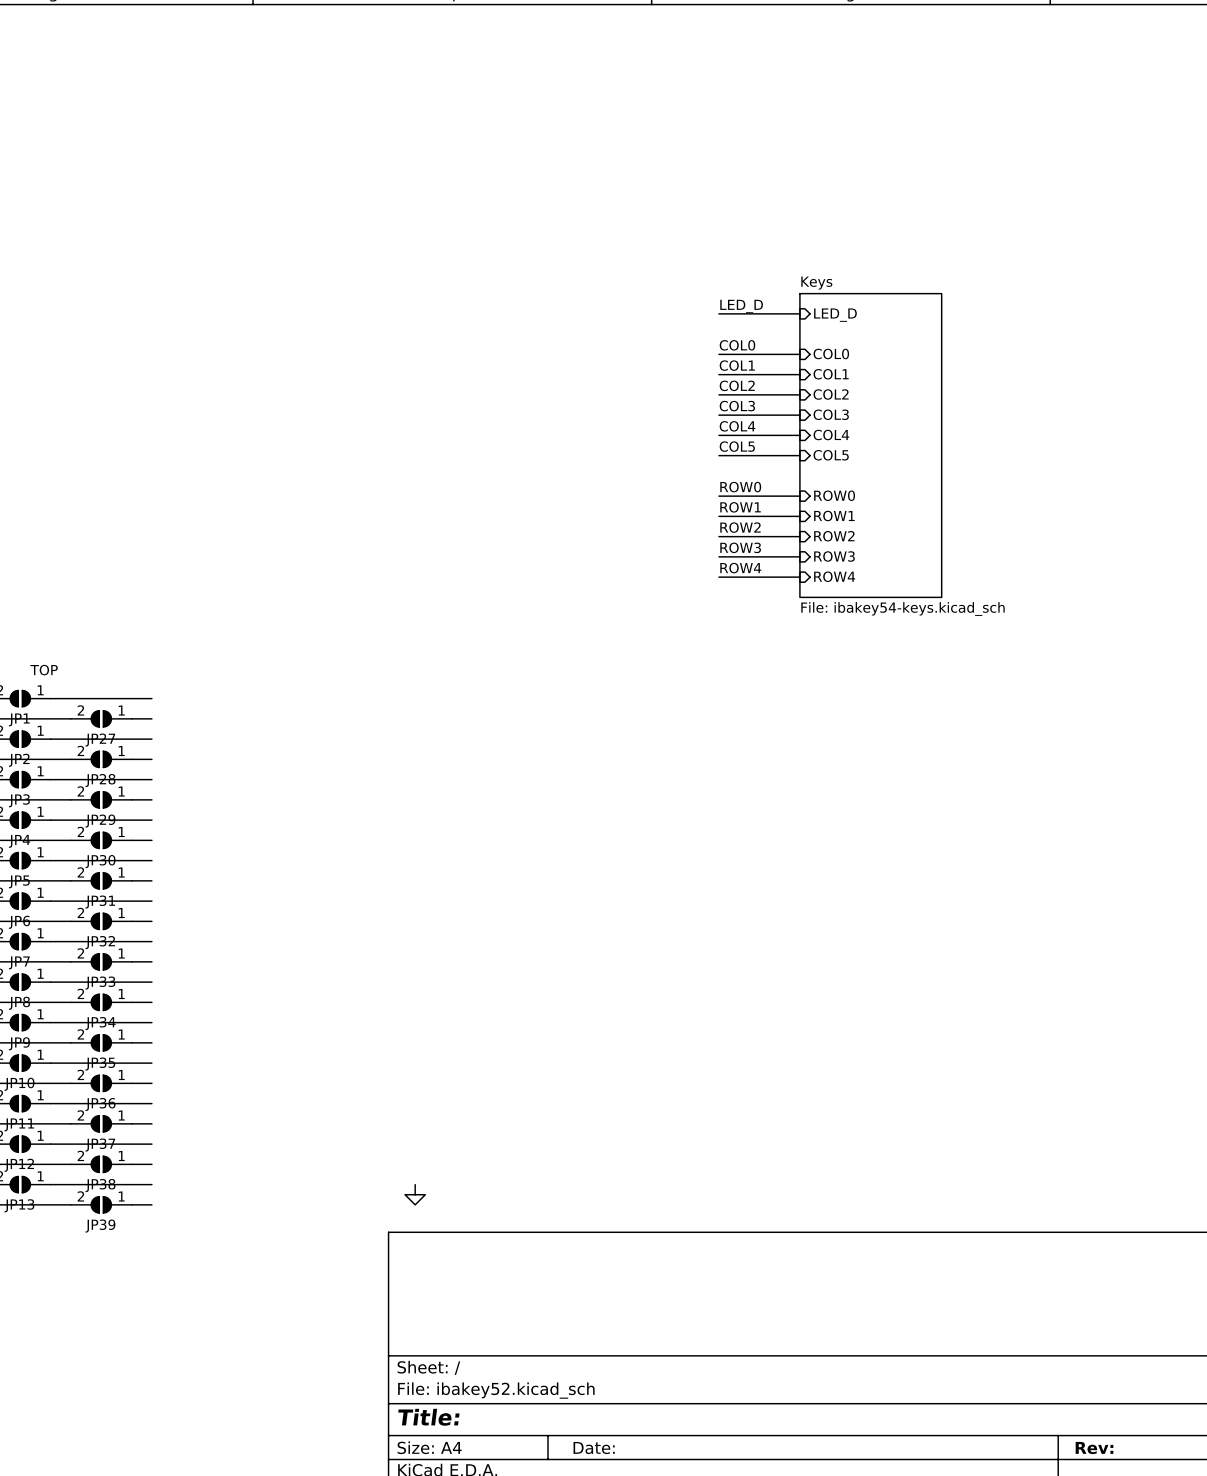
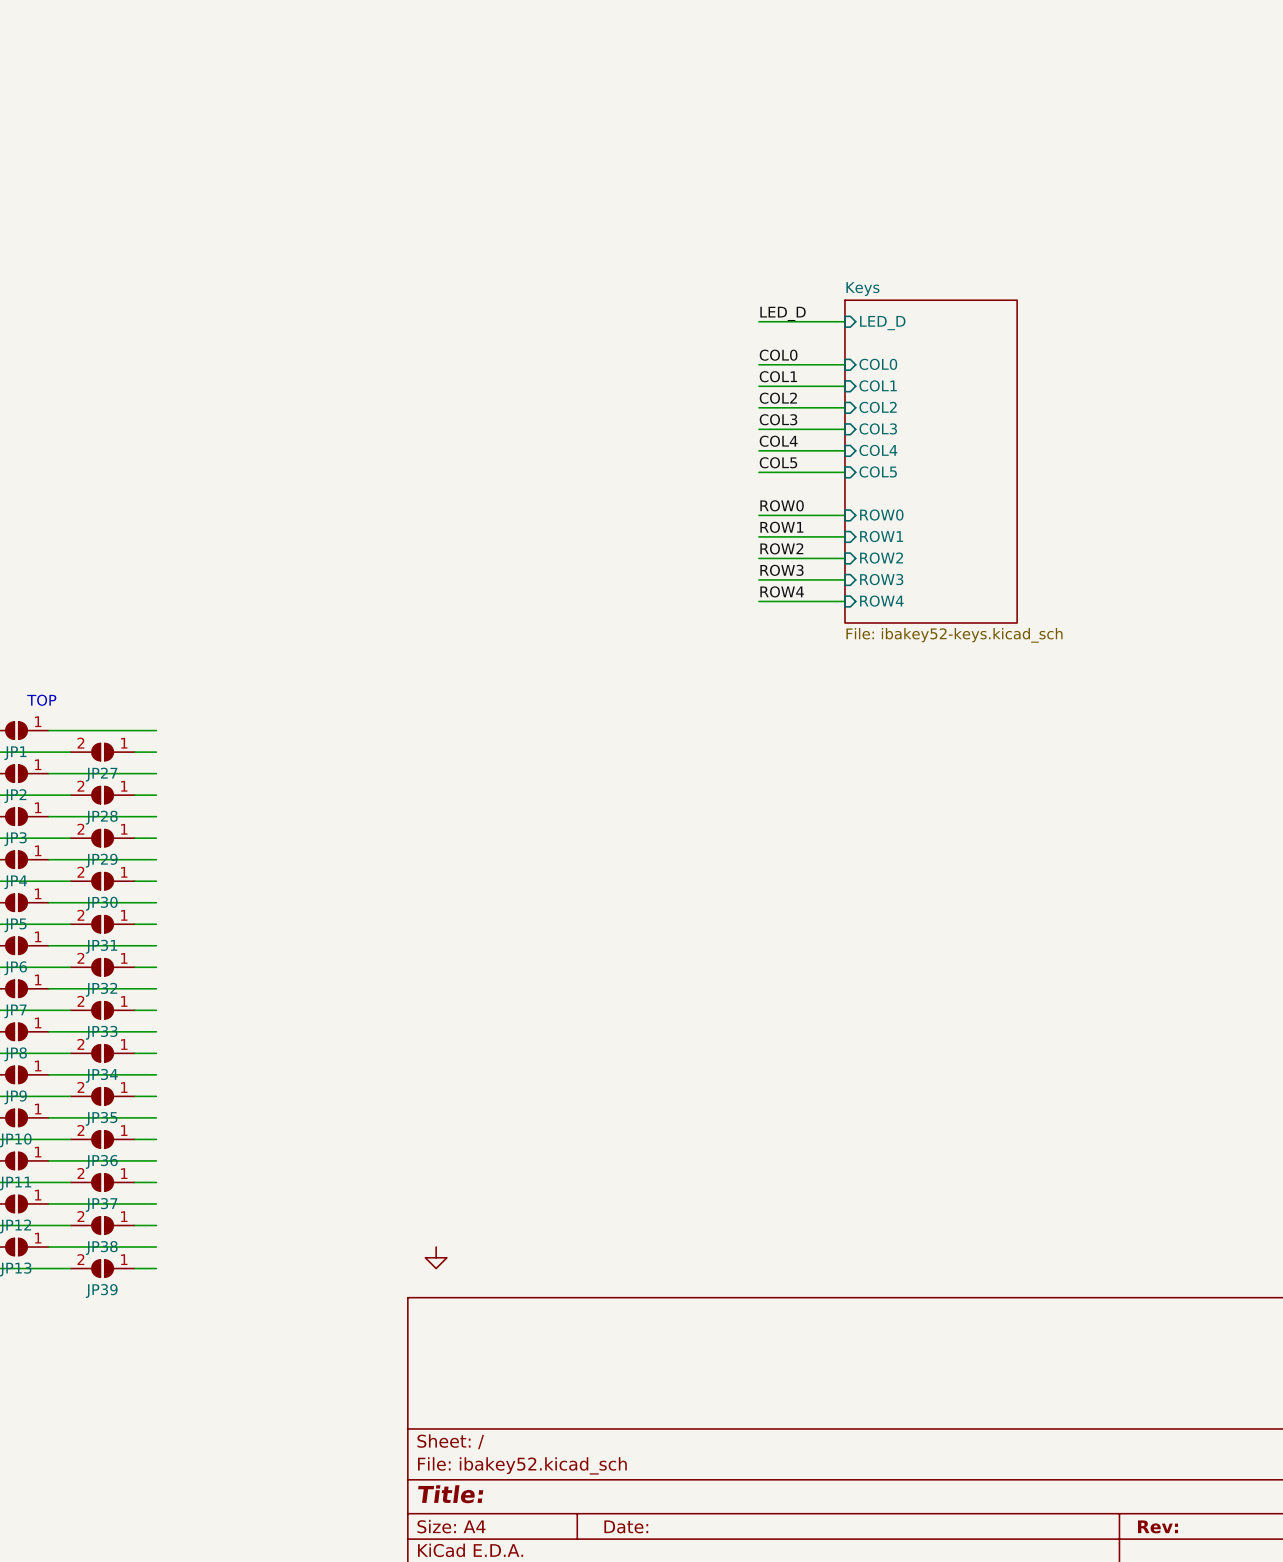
sheet Keys: File: ibakey54-keys.kicad_sch (870, 445) -> none
sheet Keys: none -> File: ibakey52-keys.kicad_sch (931, 461)

